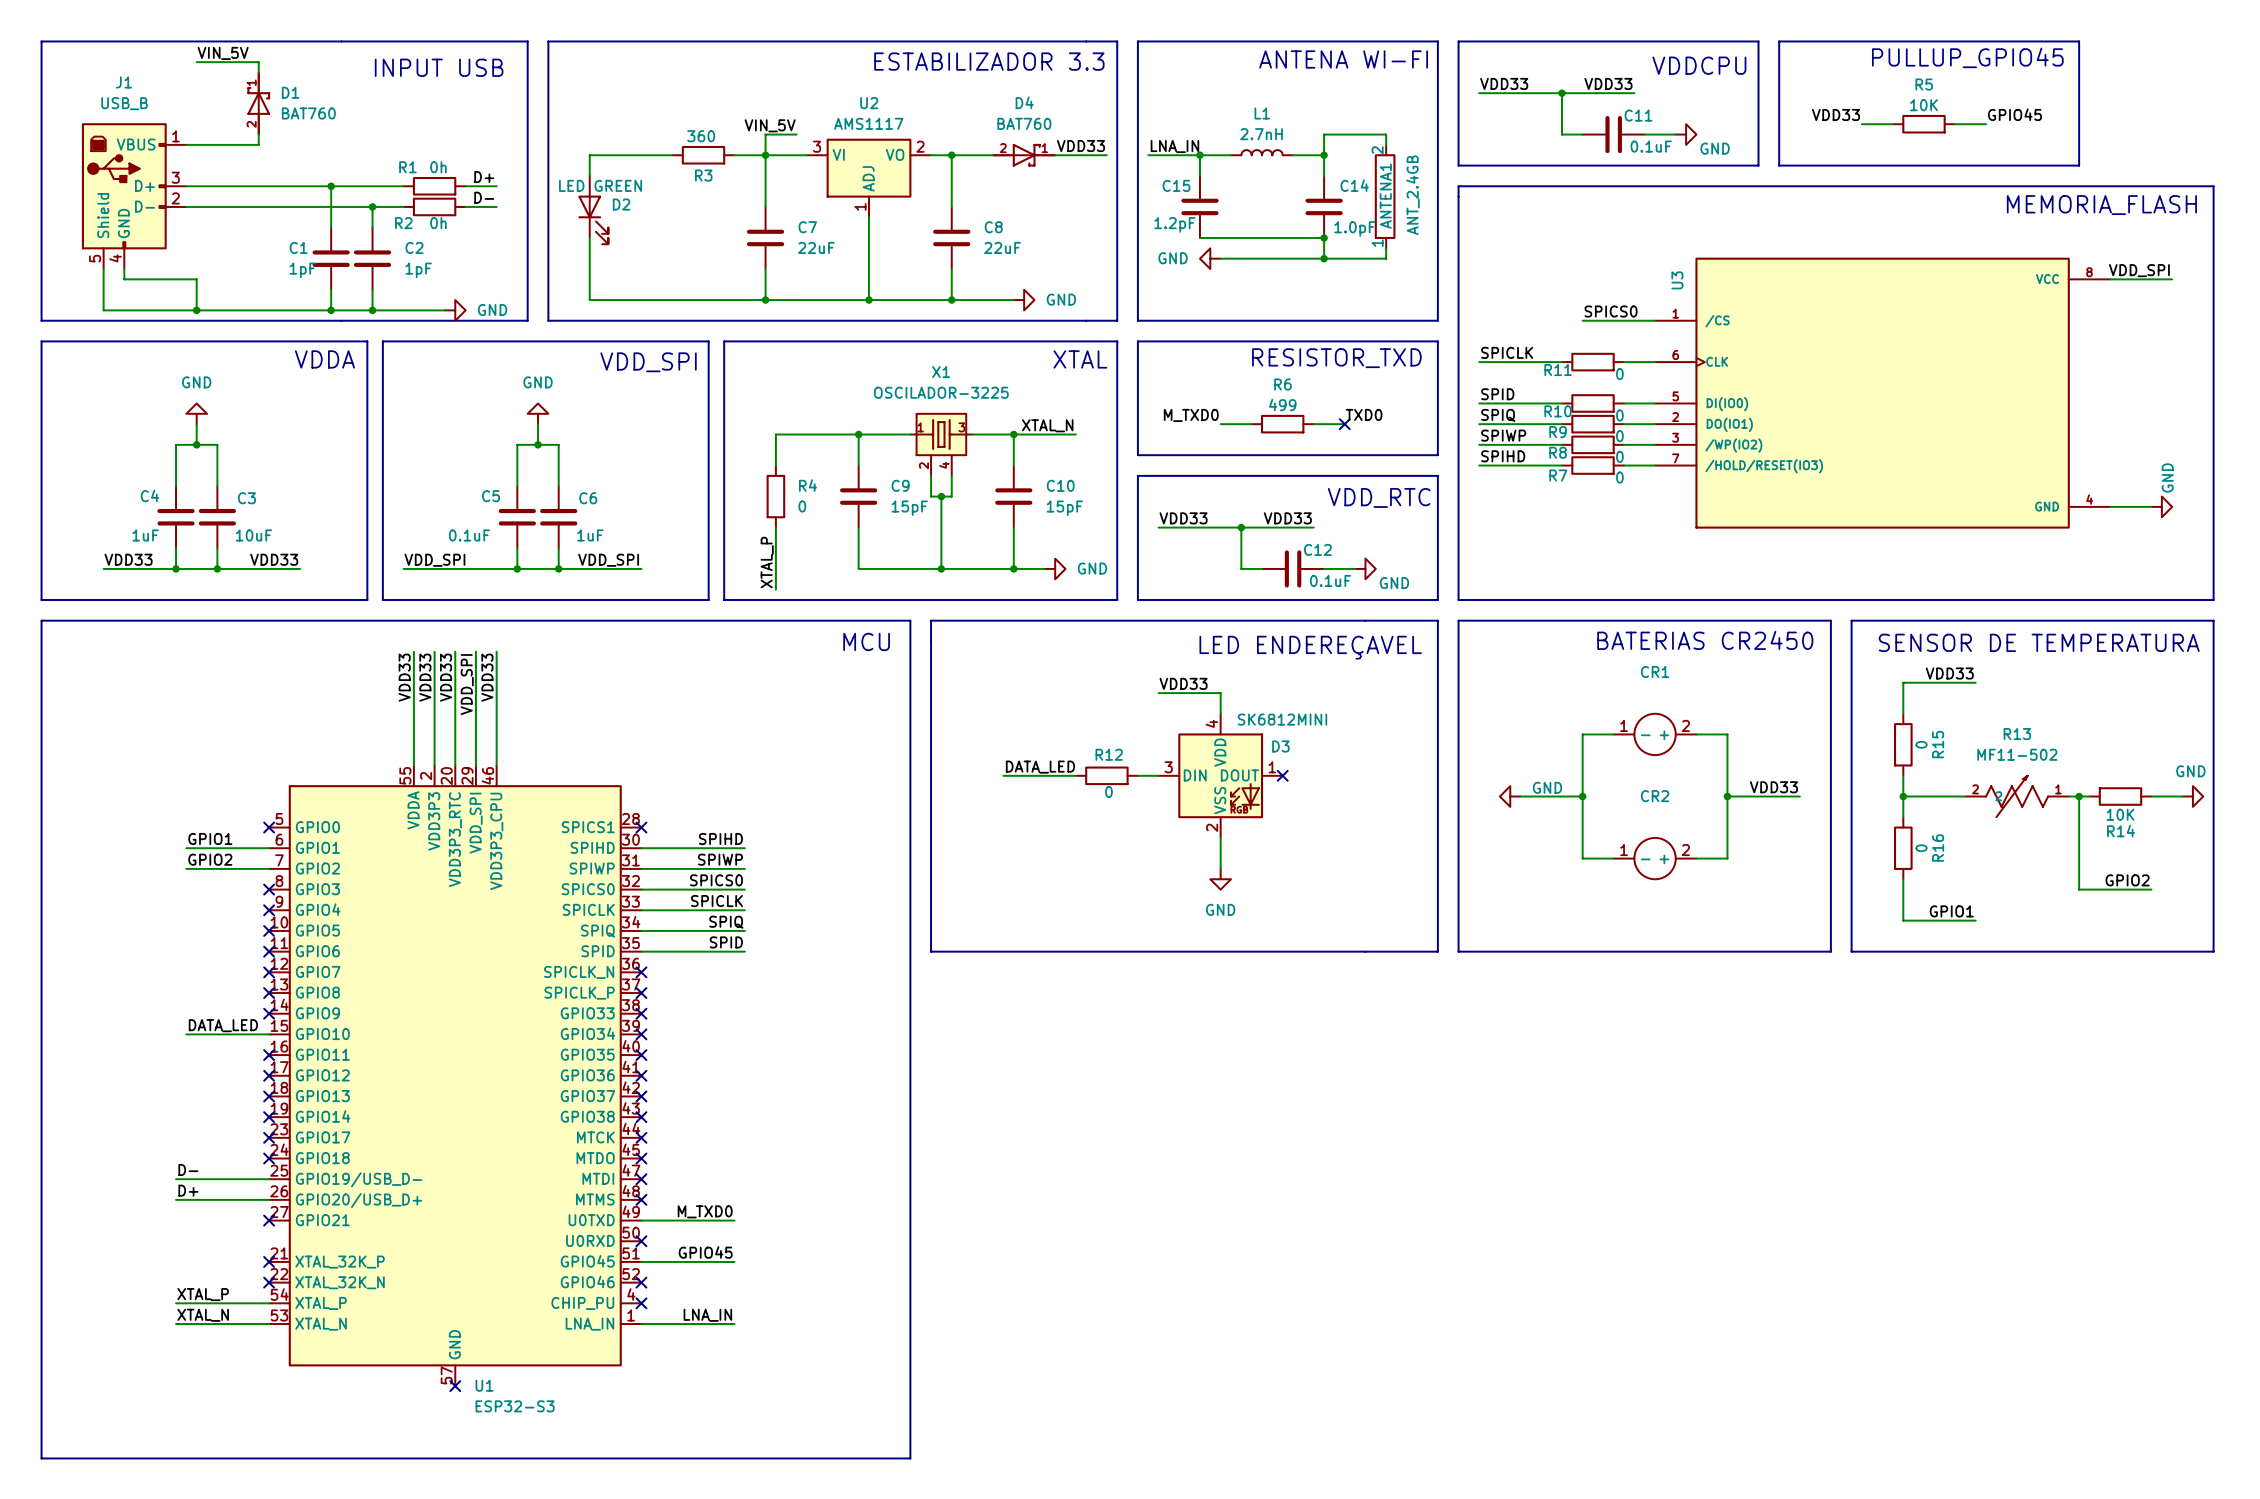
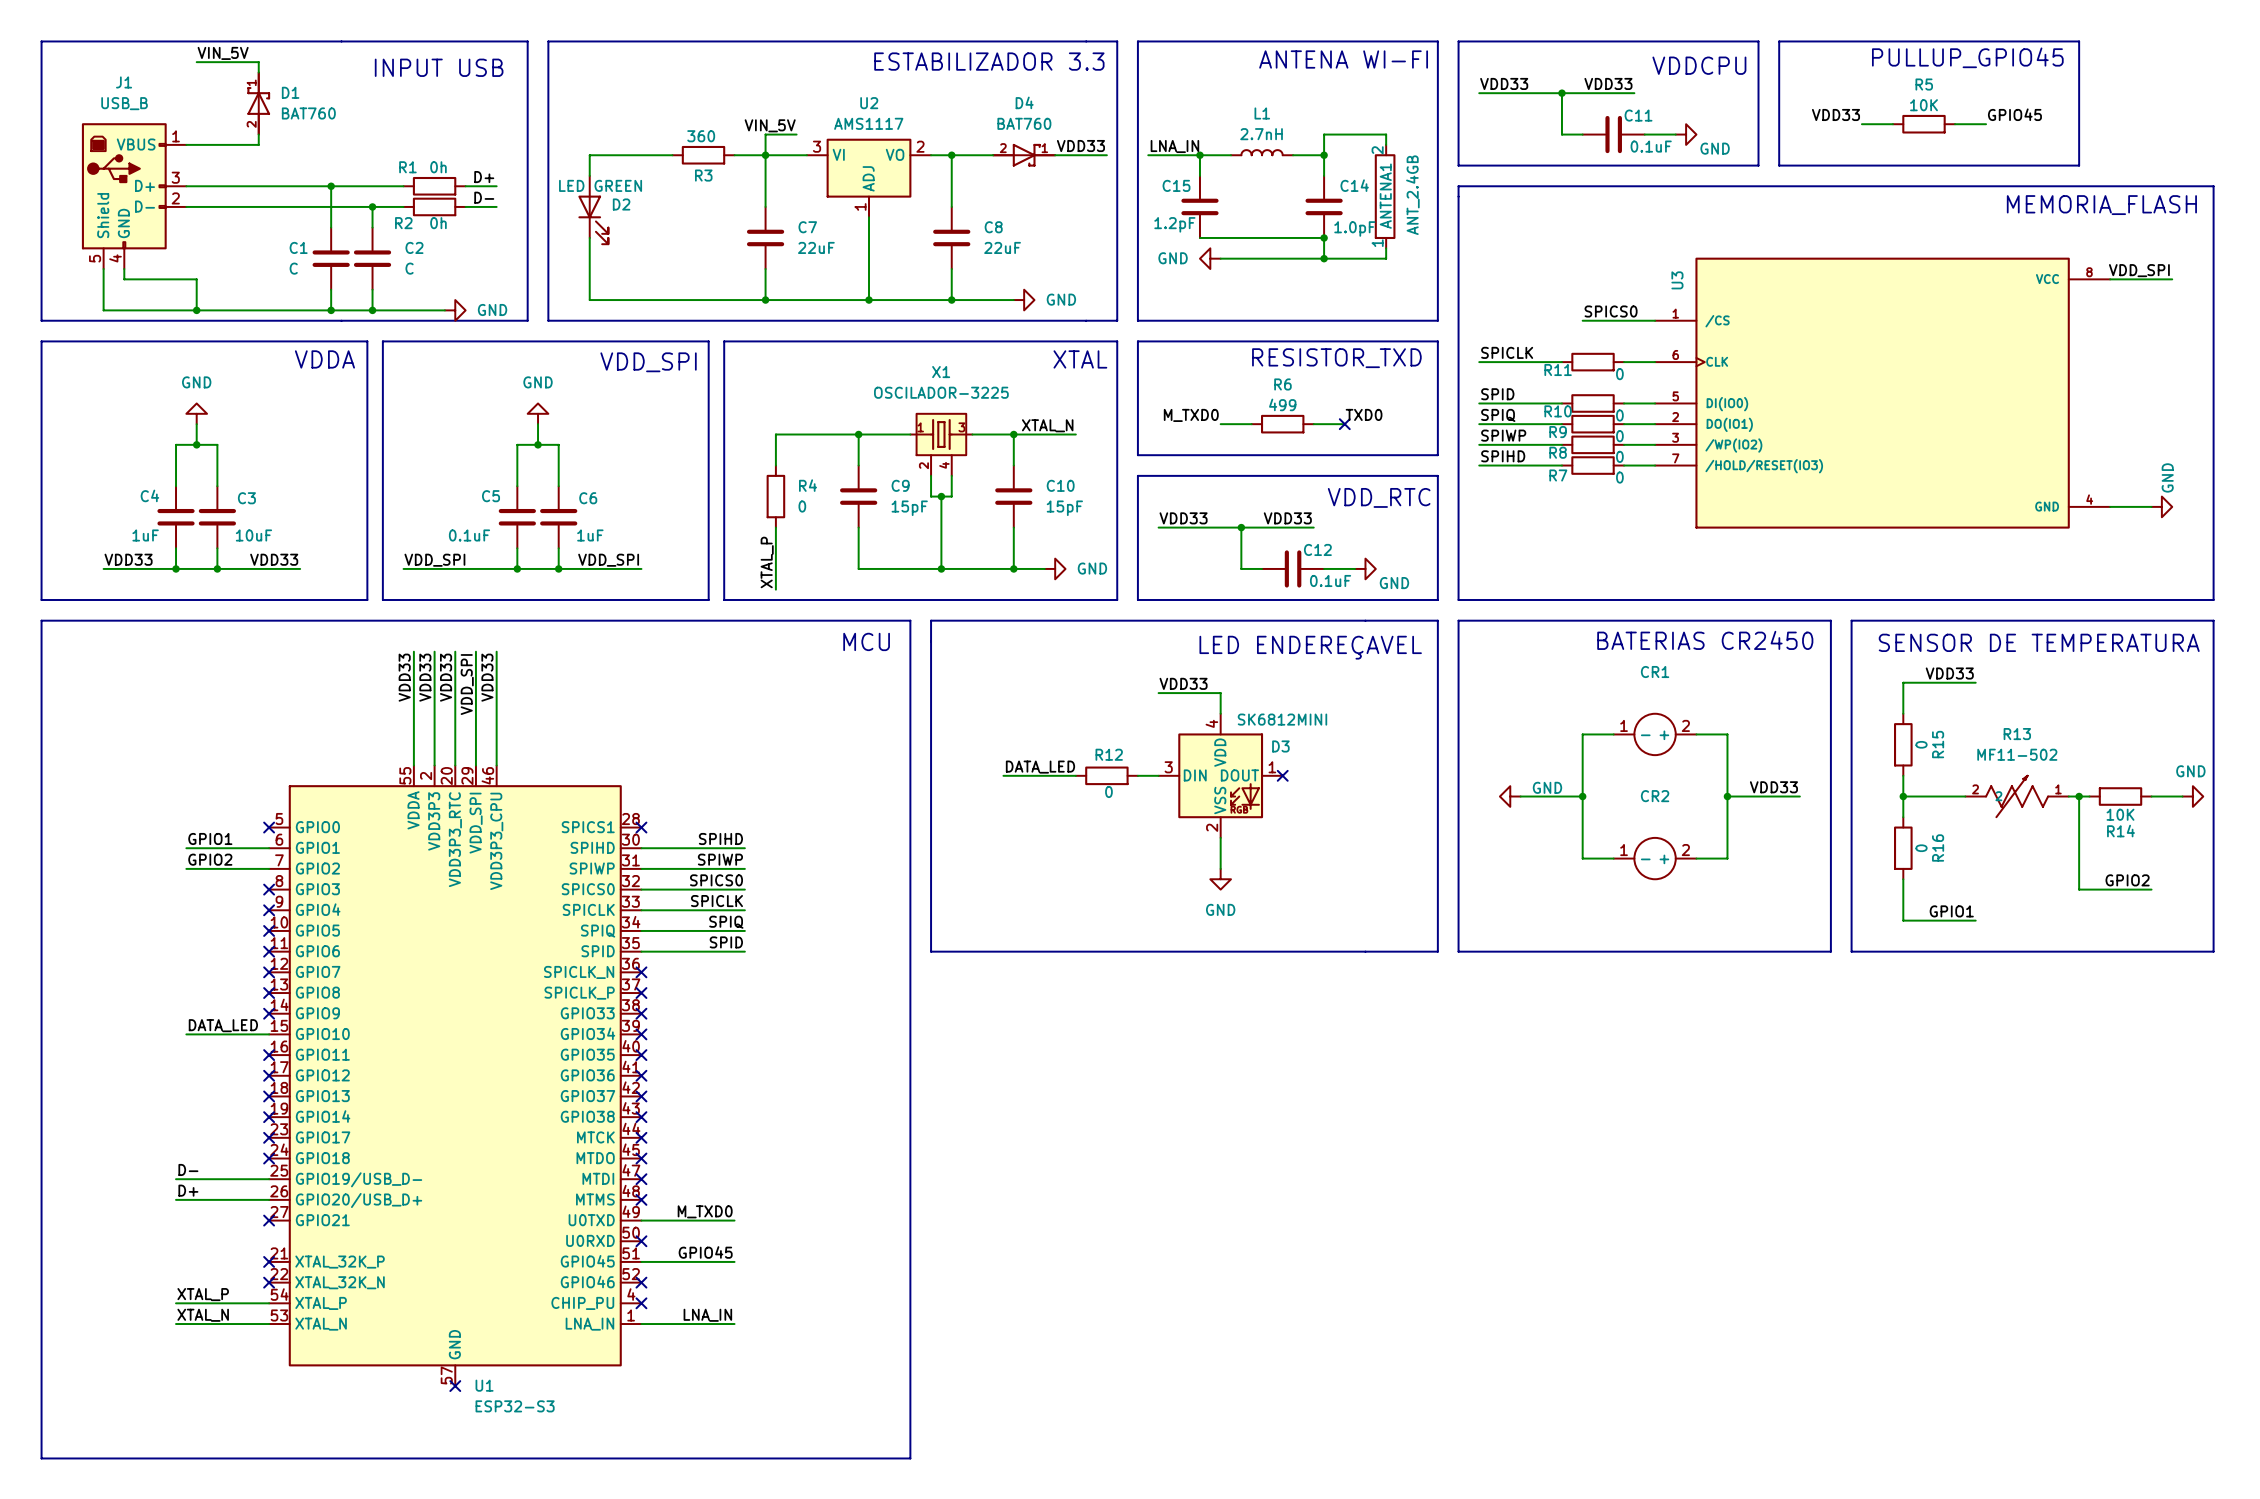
C1 value: 1pF (302, 270) -> C (293, 268)
C2 value: 1pF (418, 270) -> C (409, 268)

